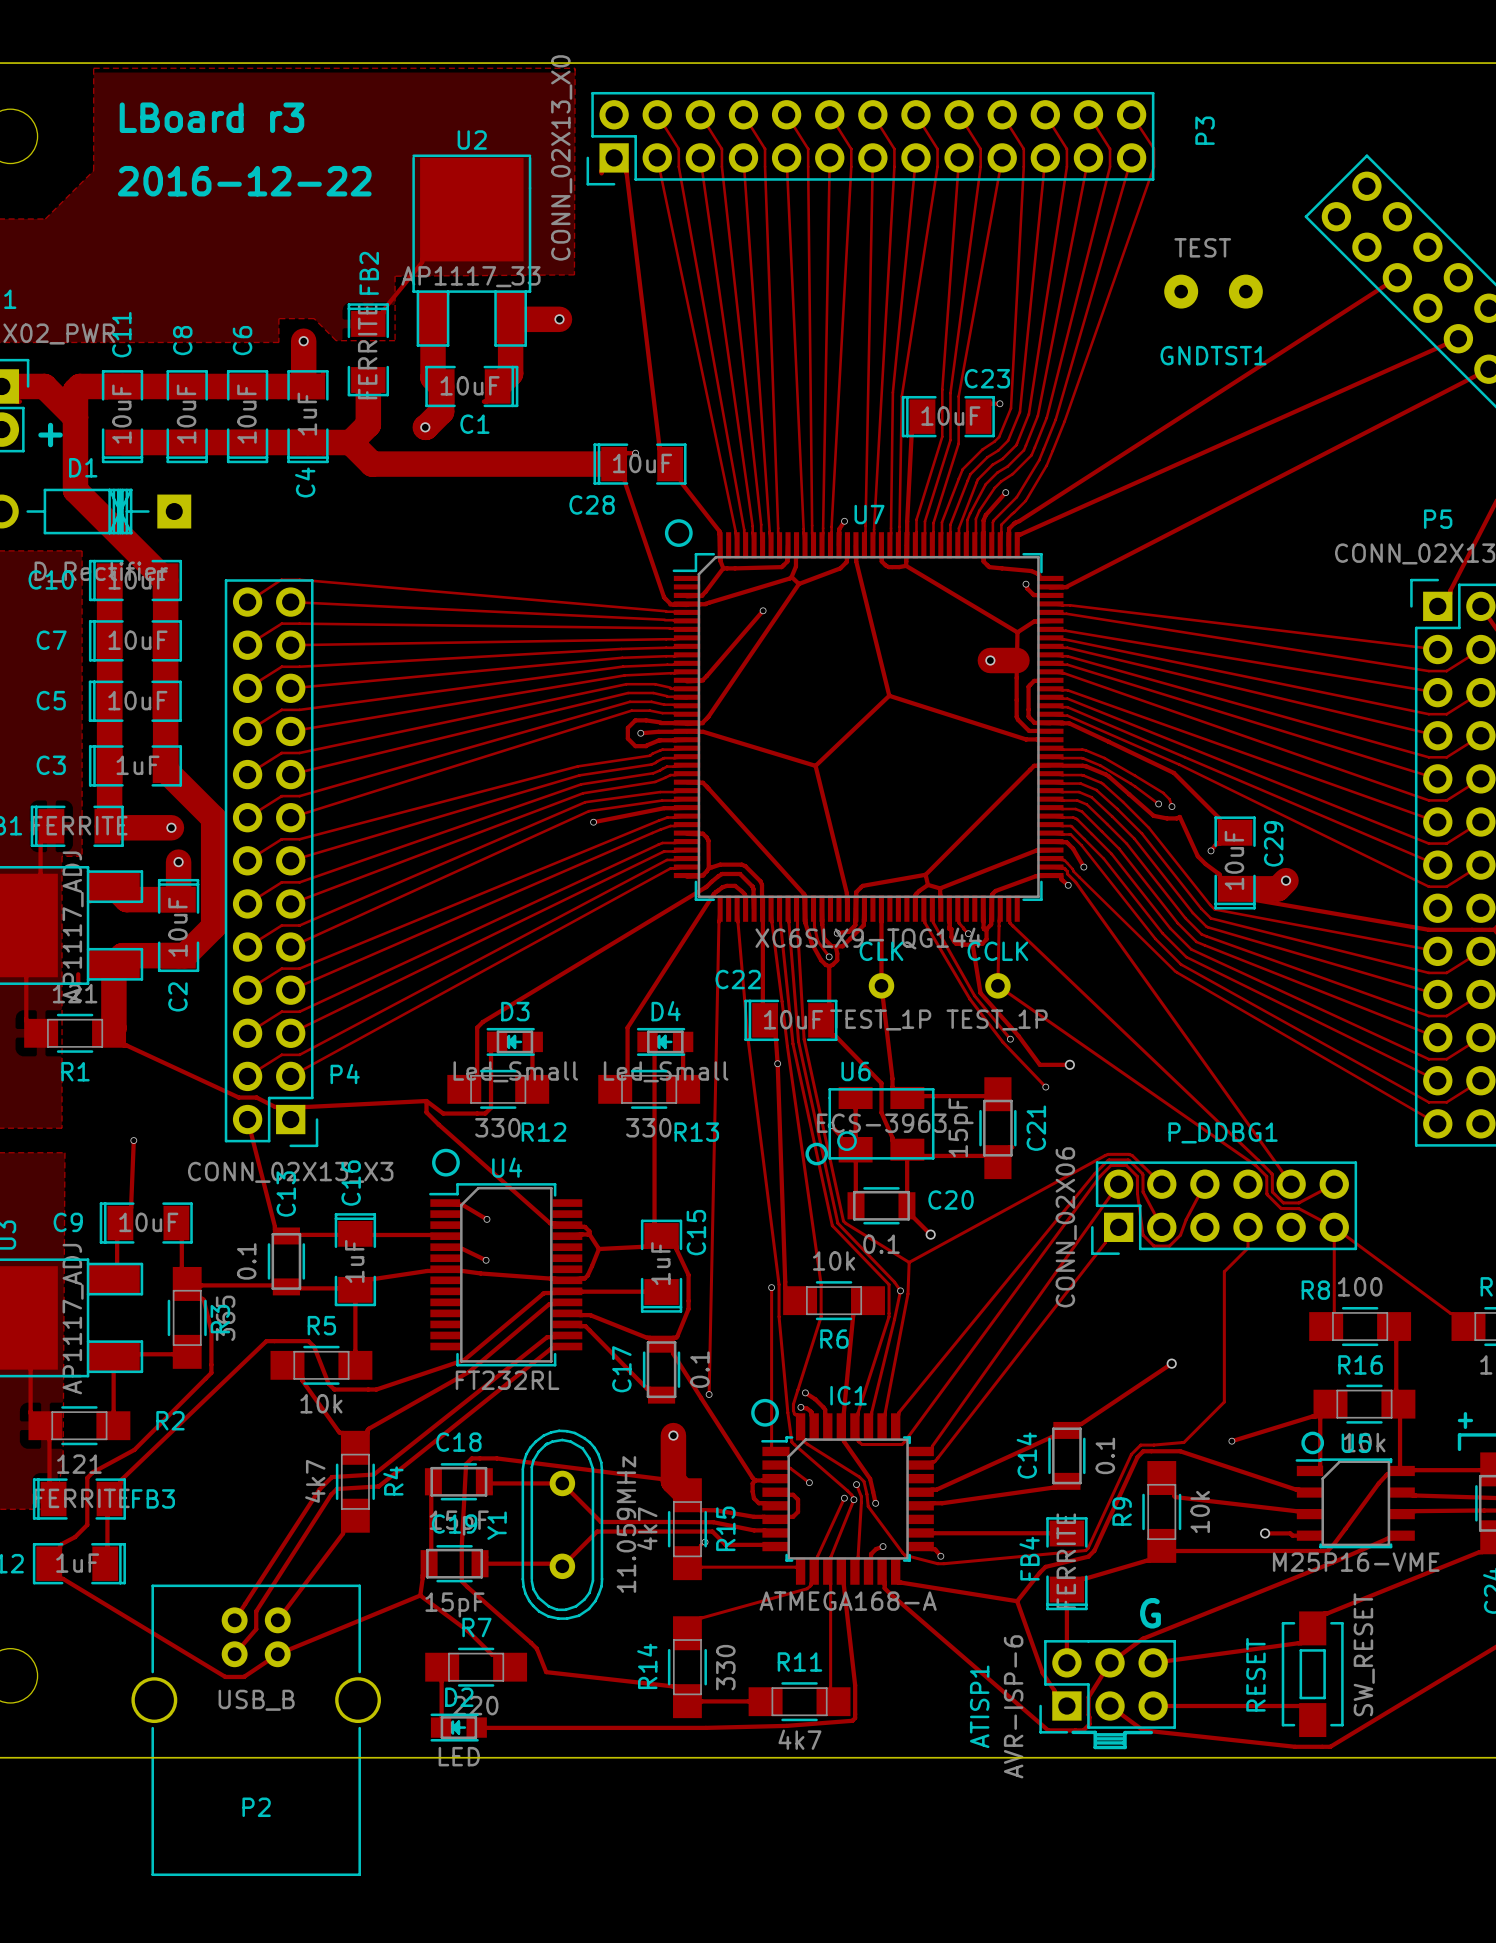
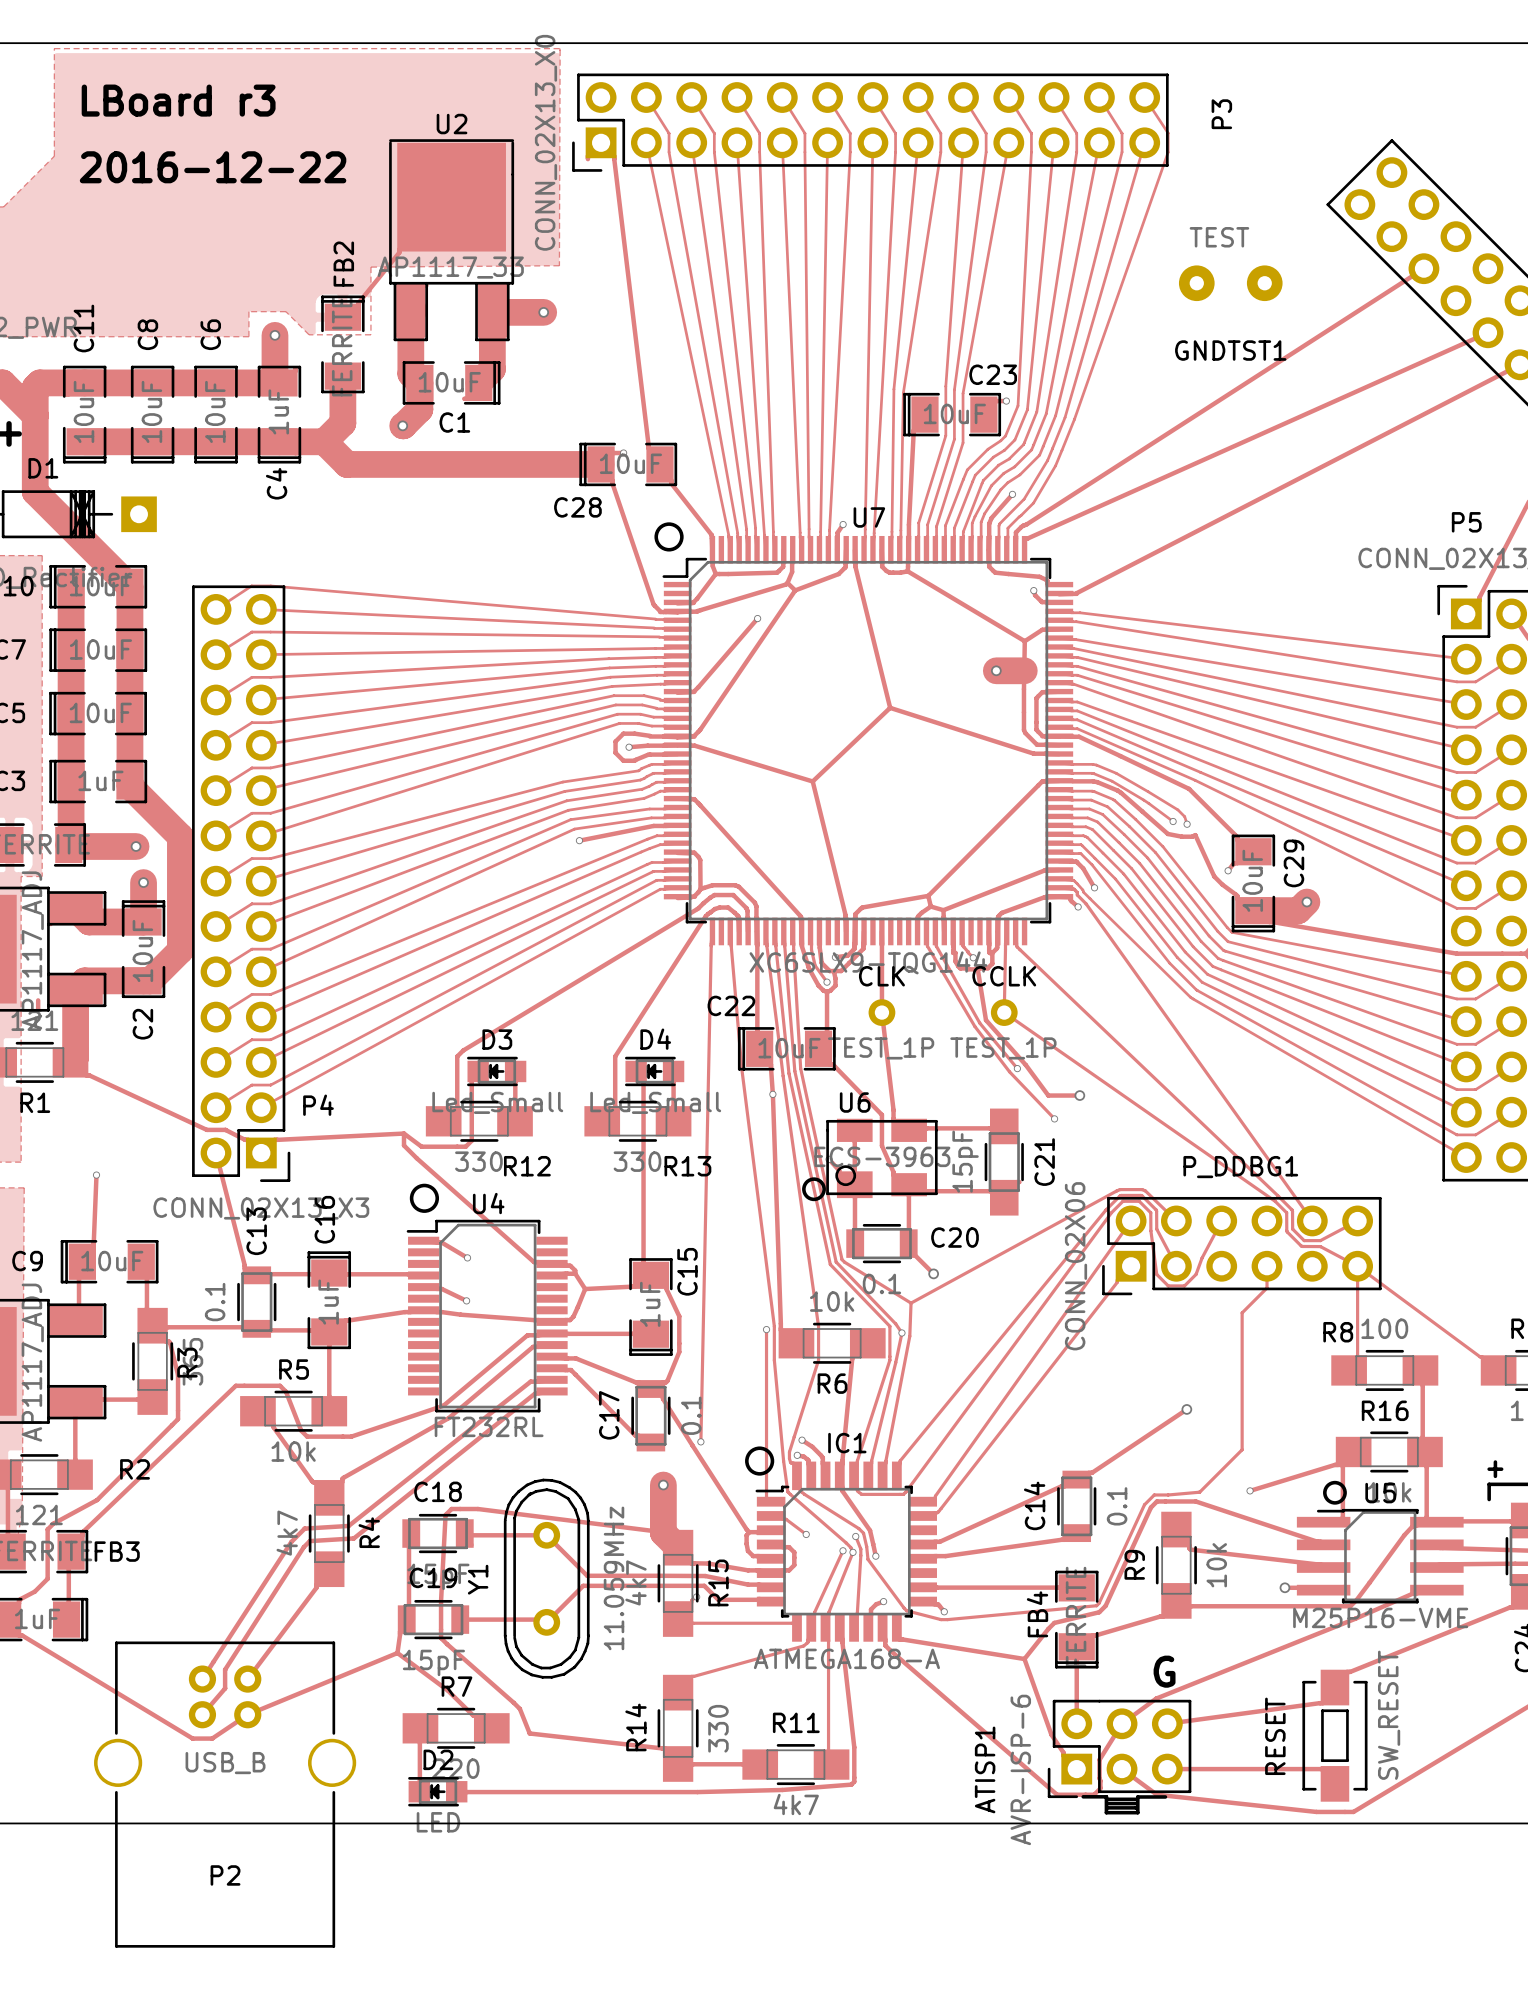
U5 footprint: [1295, 1458, 1415, 1549] -> [1296, 1508, 1464, 1604]

